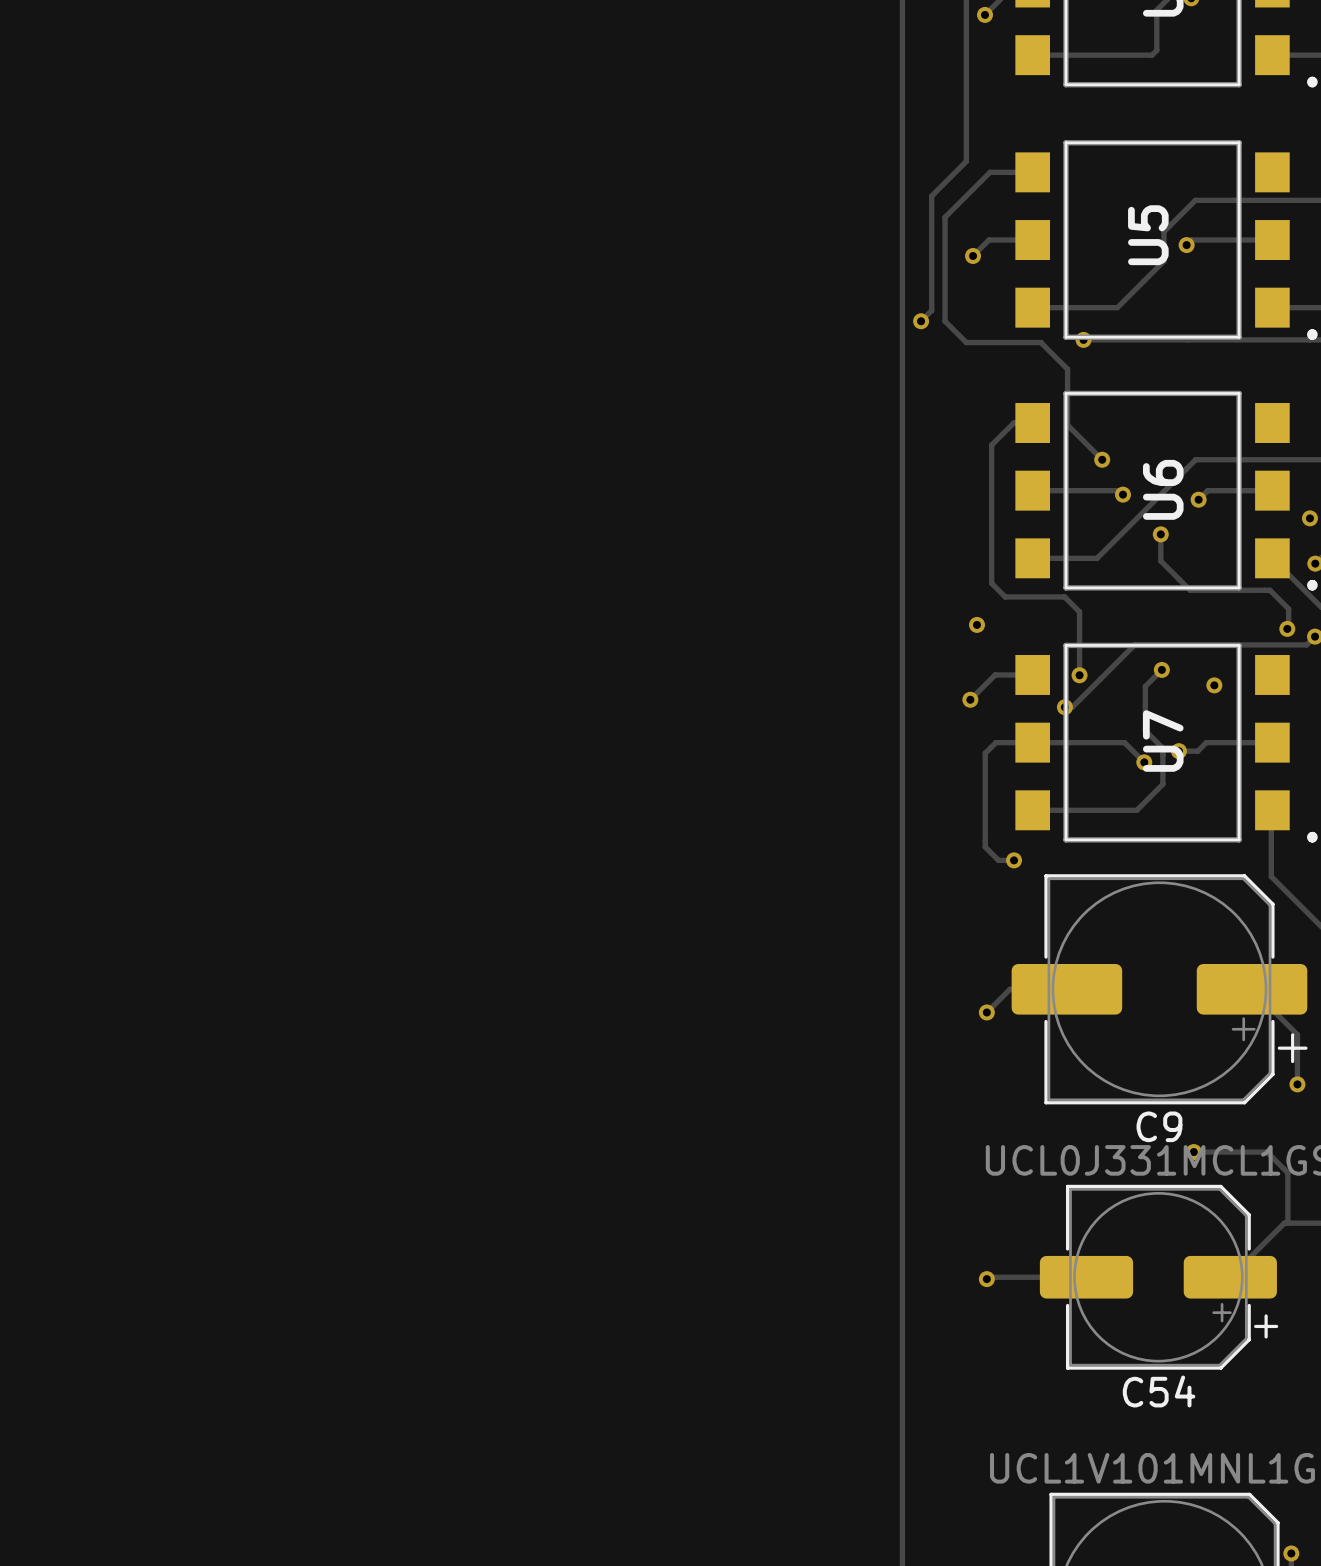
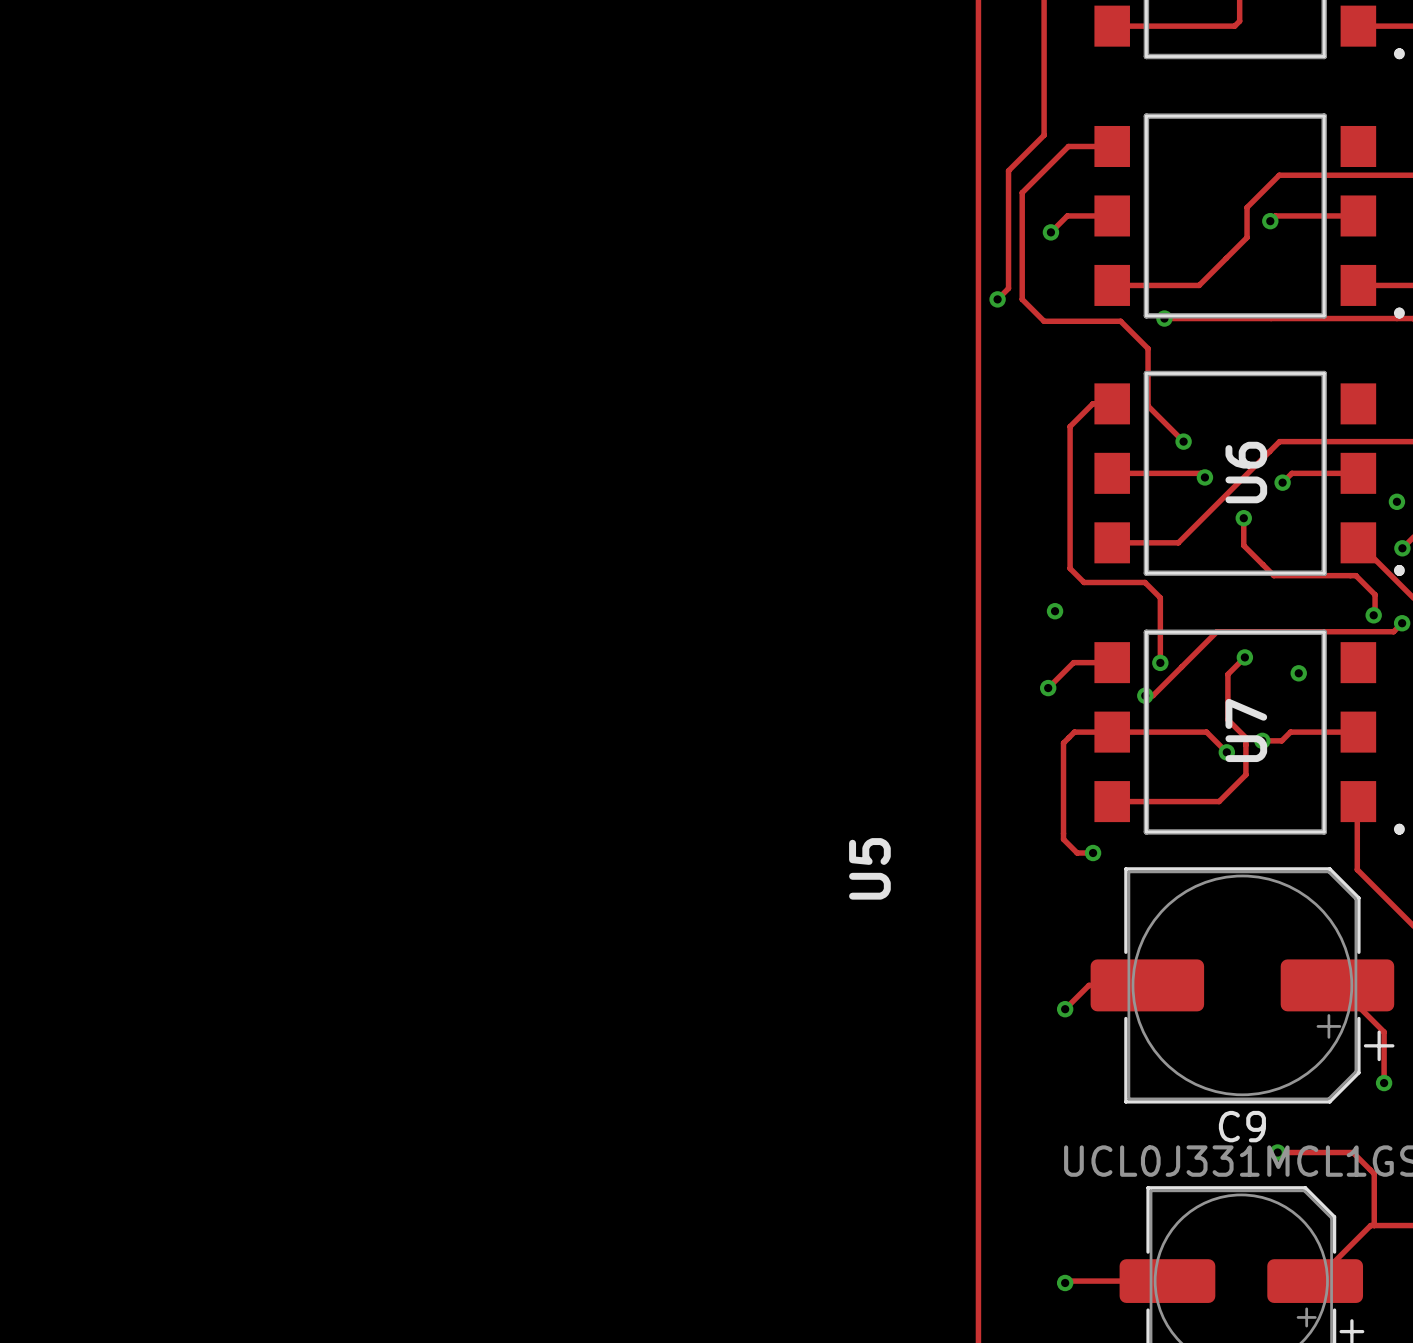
U5 name position: U5 (1148, 235) -> U5 (869, 868)

